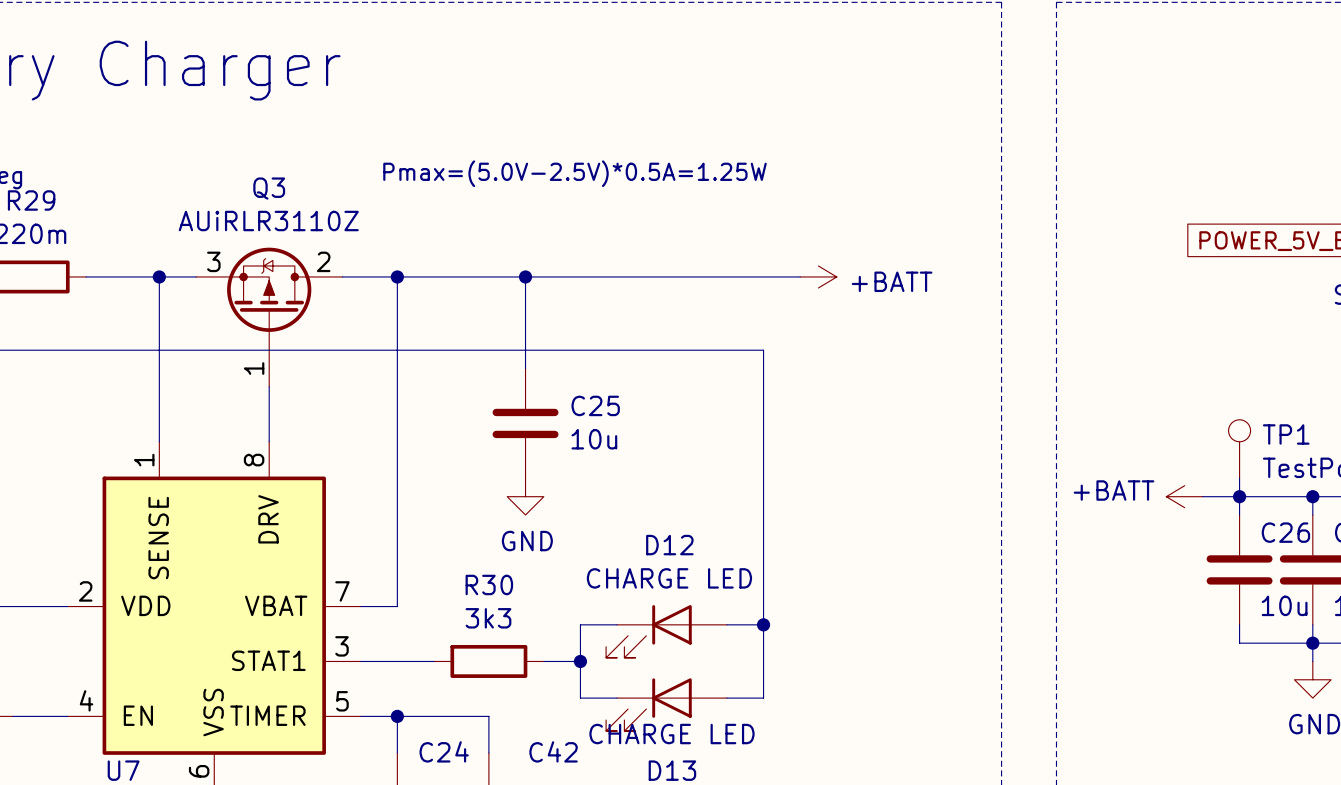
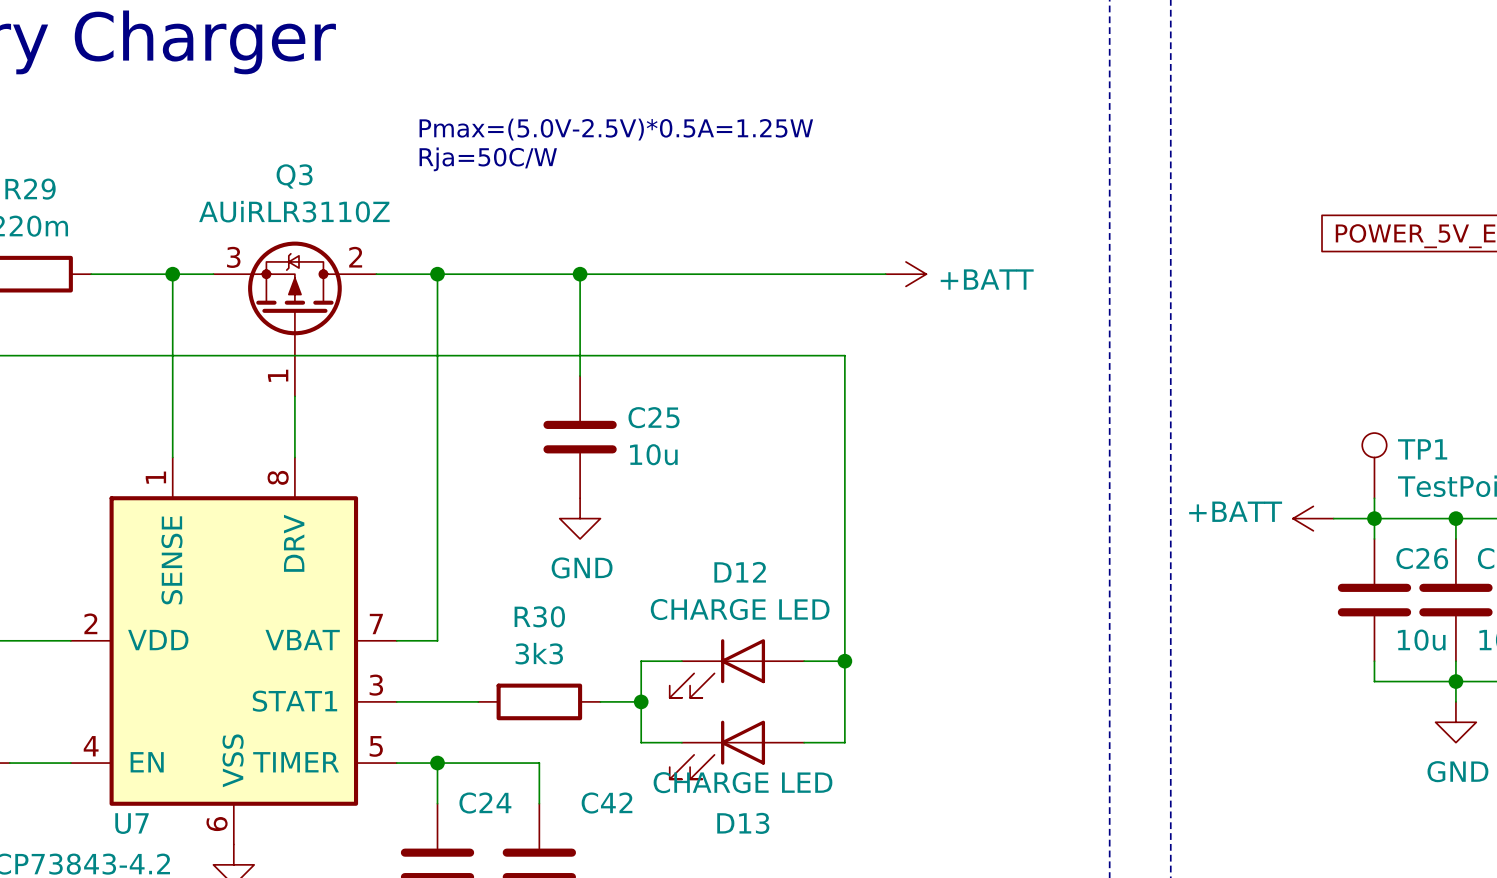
text: none -> Pmax=(5.0V-2.5V)*0.5A=1.25W (616, 129)
text: Pmax=(5.0V-2.5V)*0.5A=1.25W (574, 173) -> Rja=50C/W (488, 159)

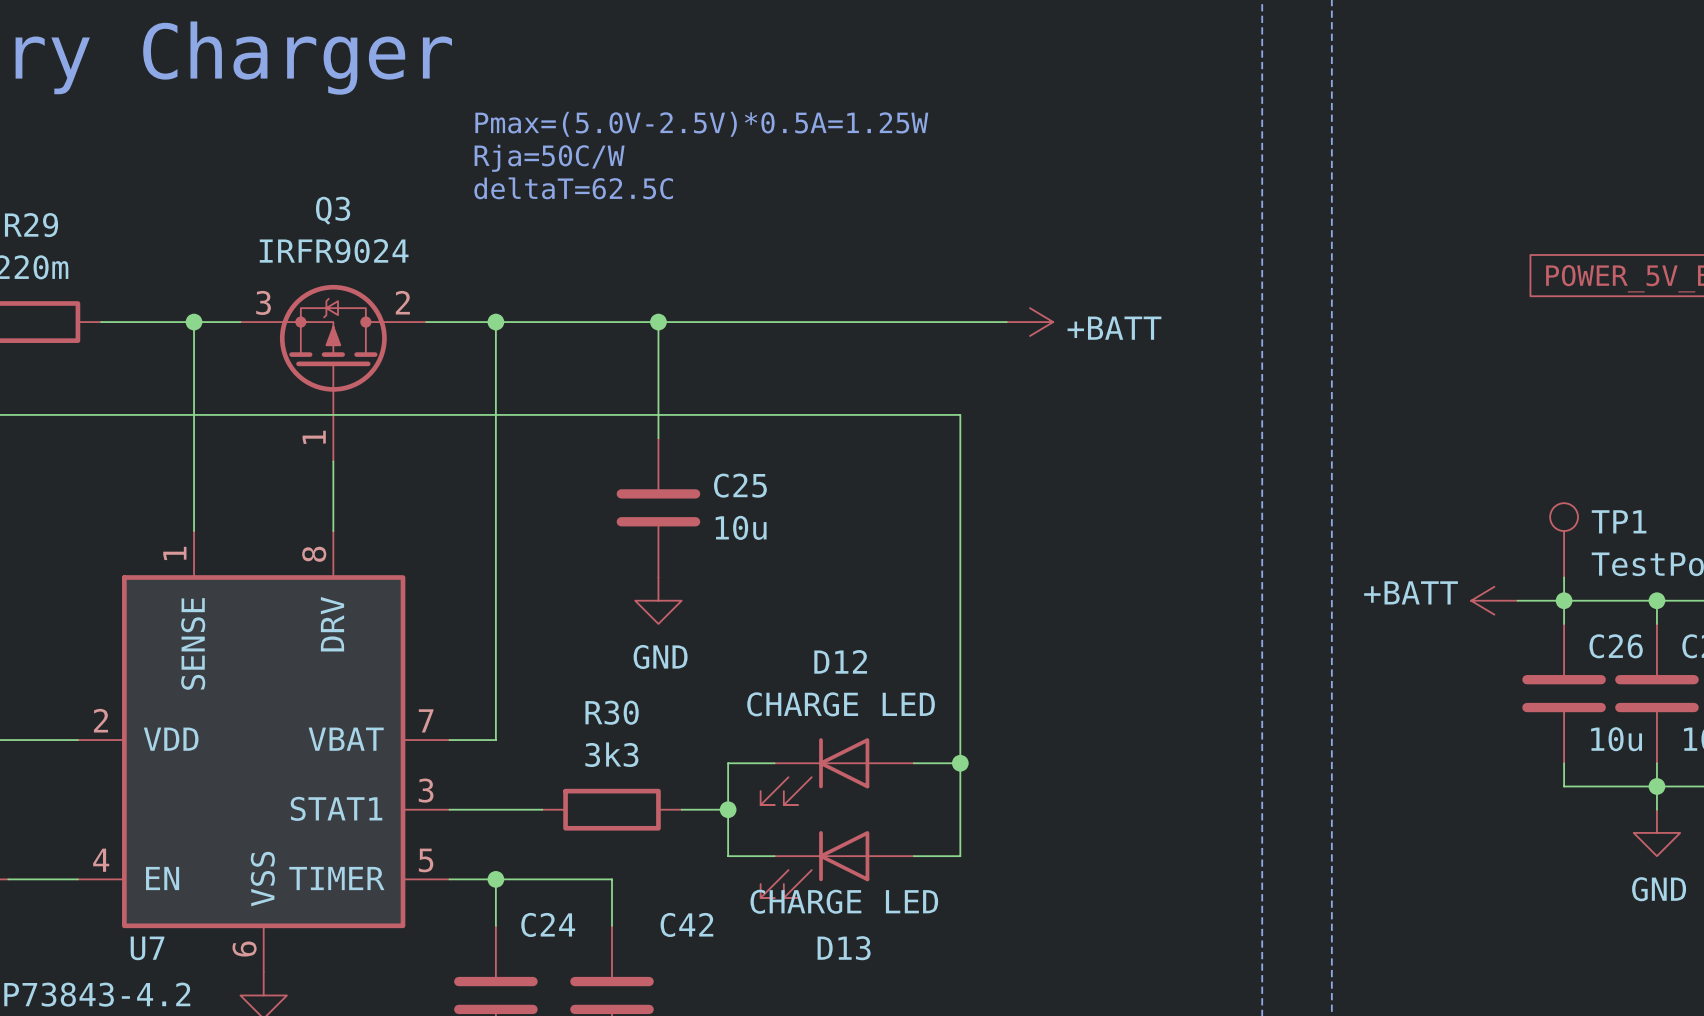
text: none -> Pmax=(5.0V-2.5V)*0.5A=1.25W (701, 124)
text: Pmax=(5.0V-2.5V)*0.5A=1.25W (616, 129) -> Rja=50C/W (549, 158)
text: Rja=50C/W (488, 159) -> deltaT=62.5C (573, 188)
Q3 value: AUiRLR3110Z (294, 211) -> IRFR9024 (334, 251)

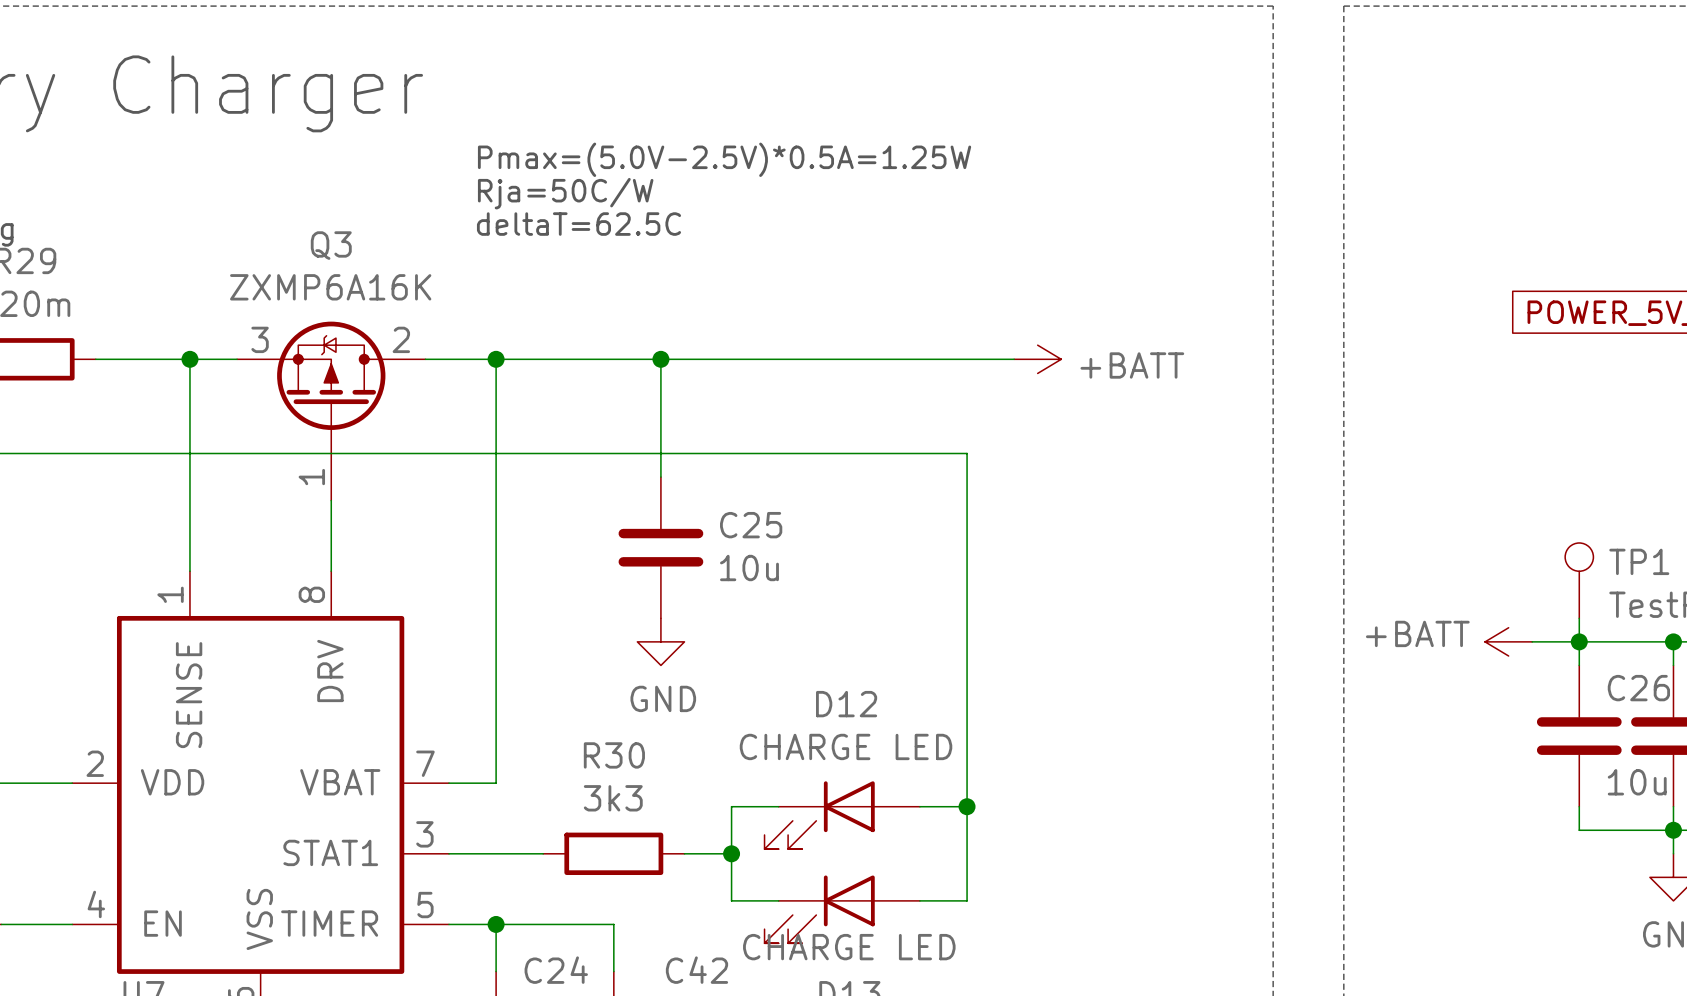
Q3 value: IRFR9024 (334, 251) -> ZXMP6A16K (330, 287)

